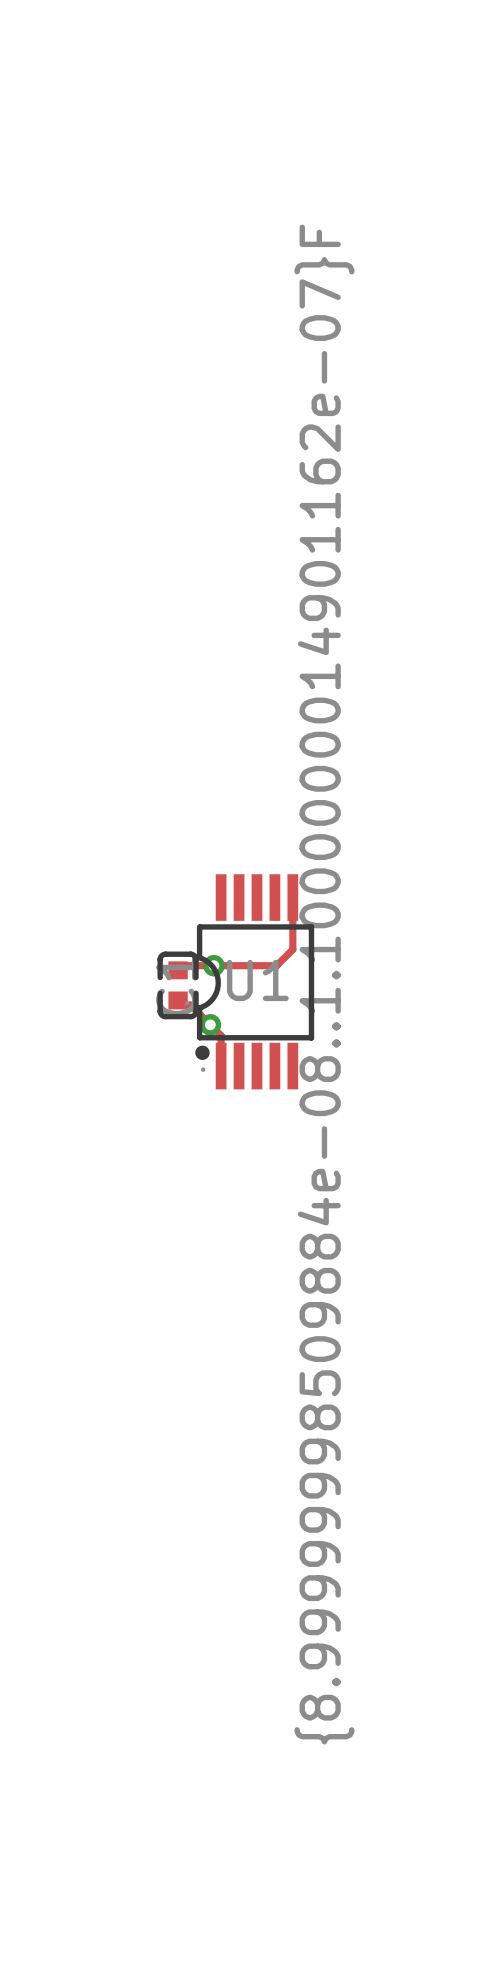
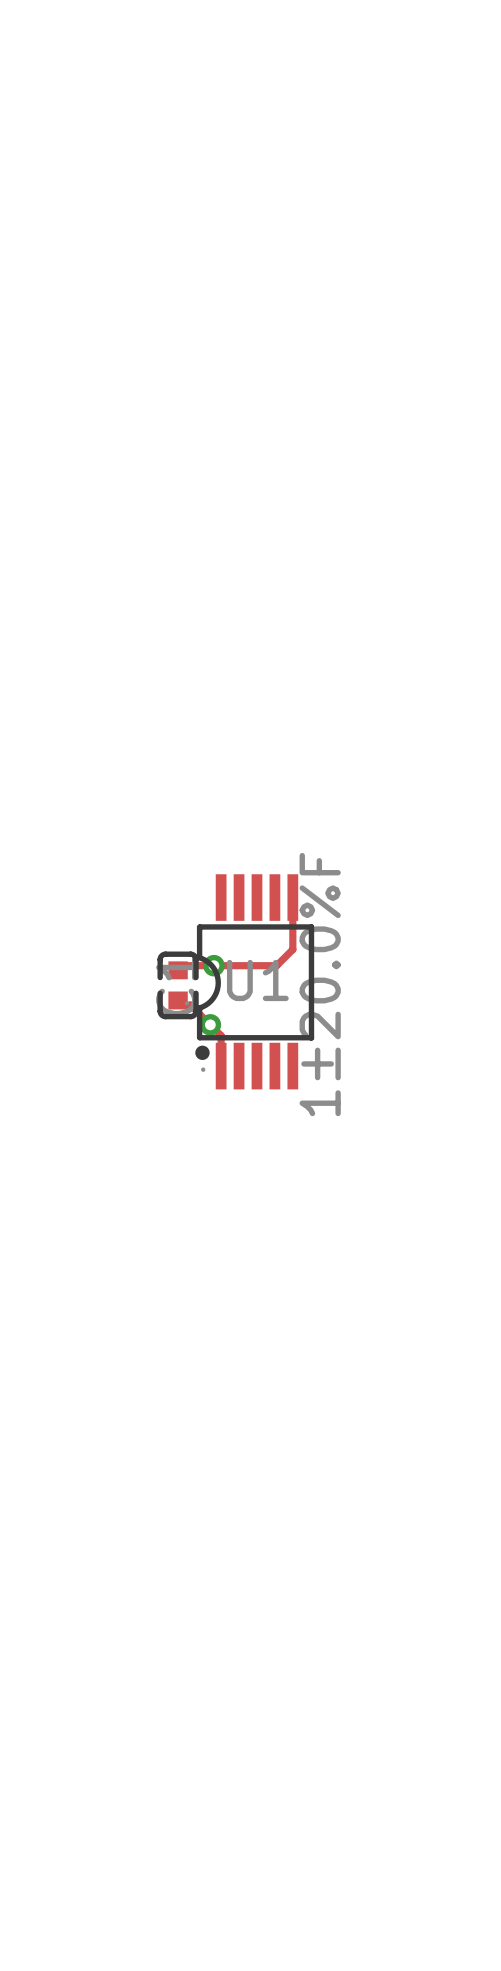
part value: {8.99999998509884e-08..1.1000000014901162e-07}F (324, 984) -> 1±20.0%F (320, 984)

